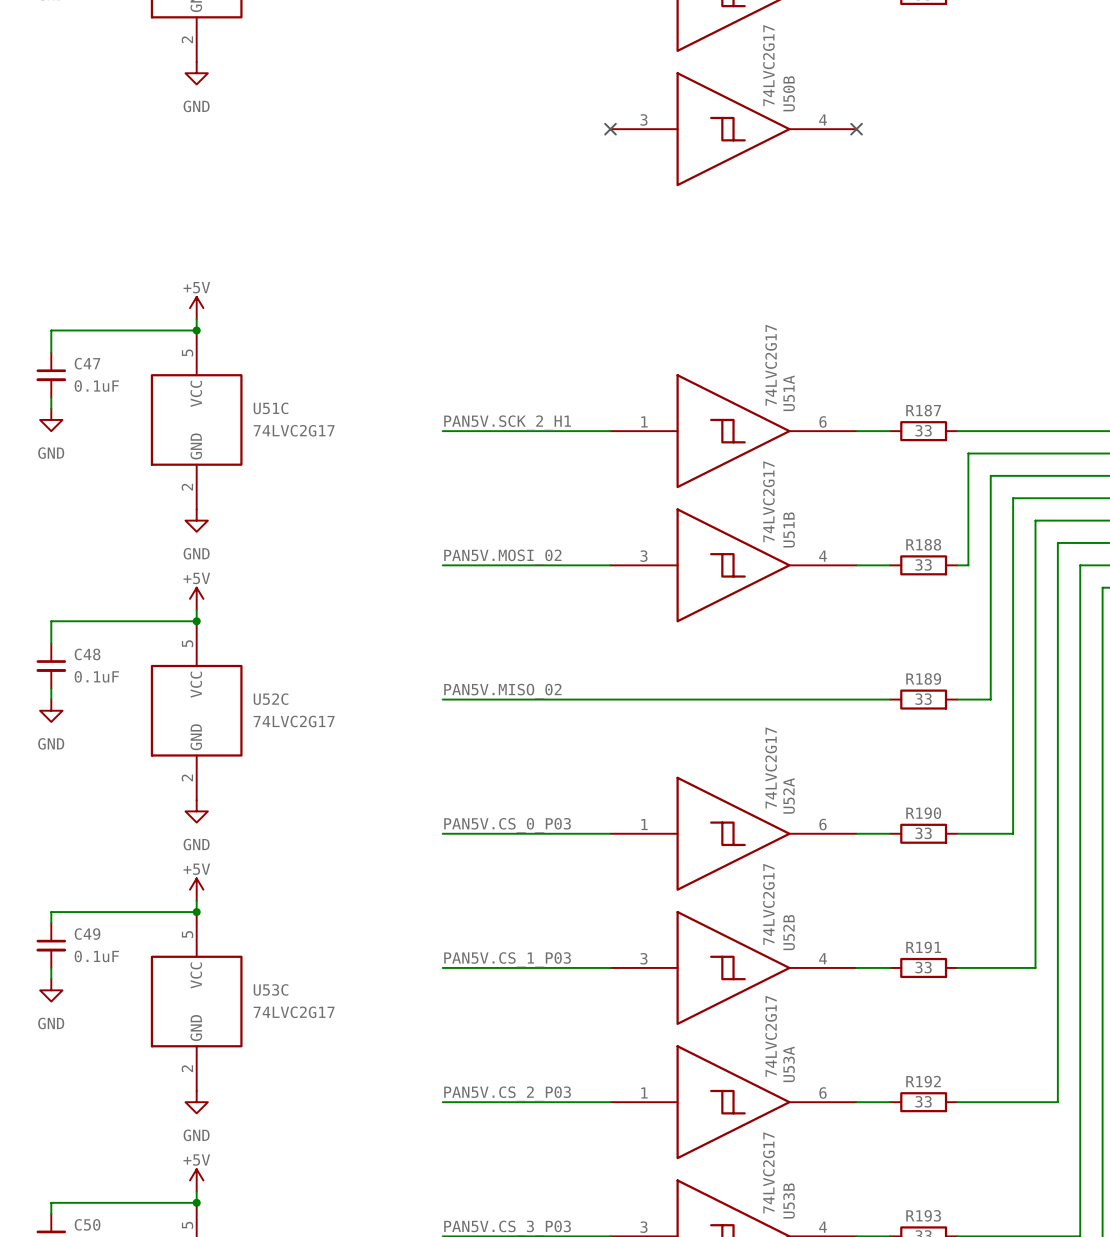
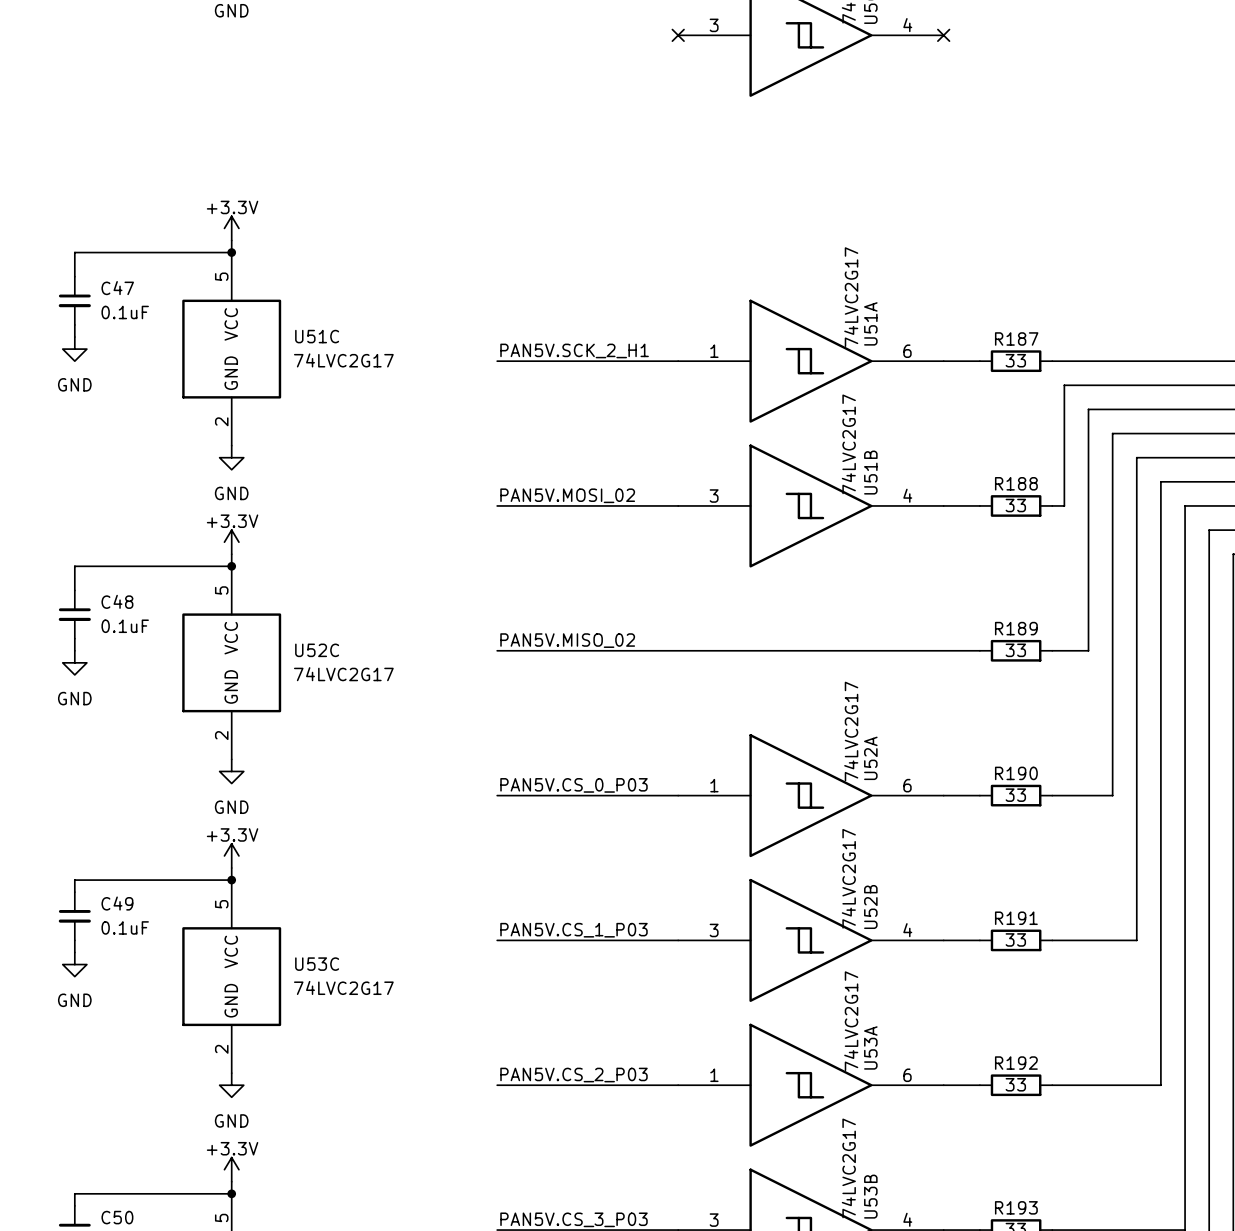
power symbol: +5V (196, 308) -> +3.3V (231, 228)
power symbol: +5V (196, 598) -> +3.3V (231, 542)
power symbol: +5V (196, 889) -> +3.3V (231, 855)
power symbol: +5V (196, 1180) -> +3.3V (231, 1169)

